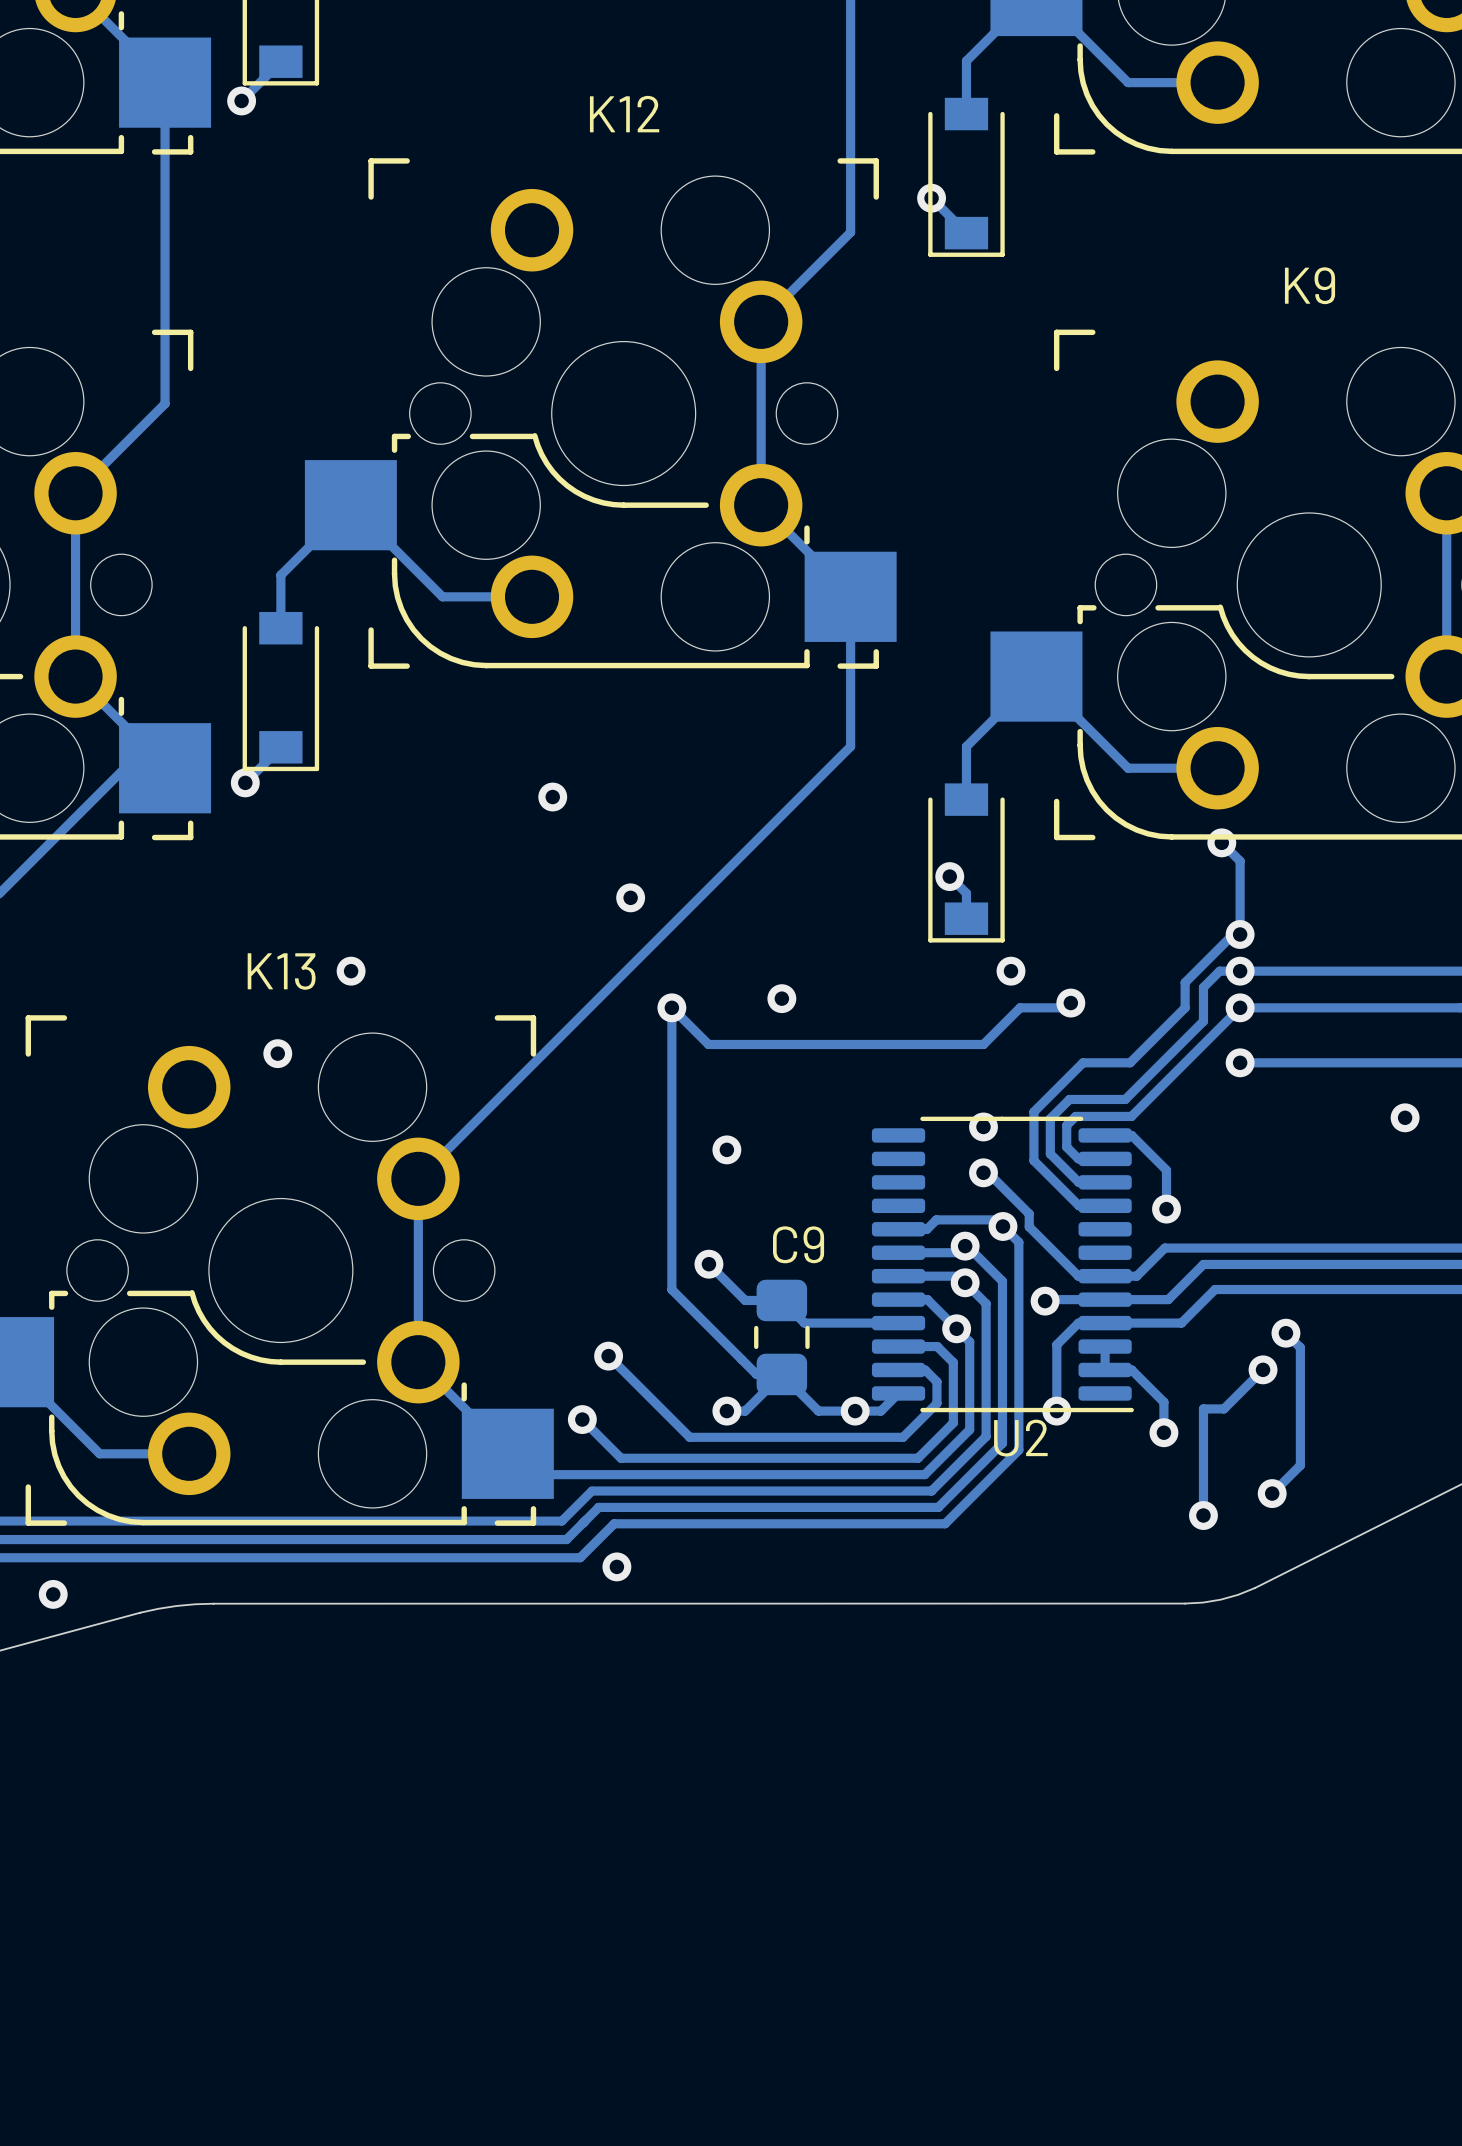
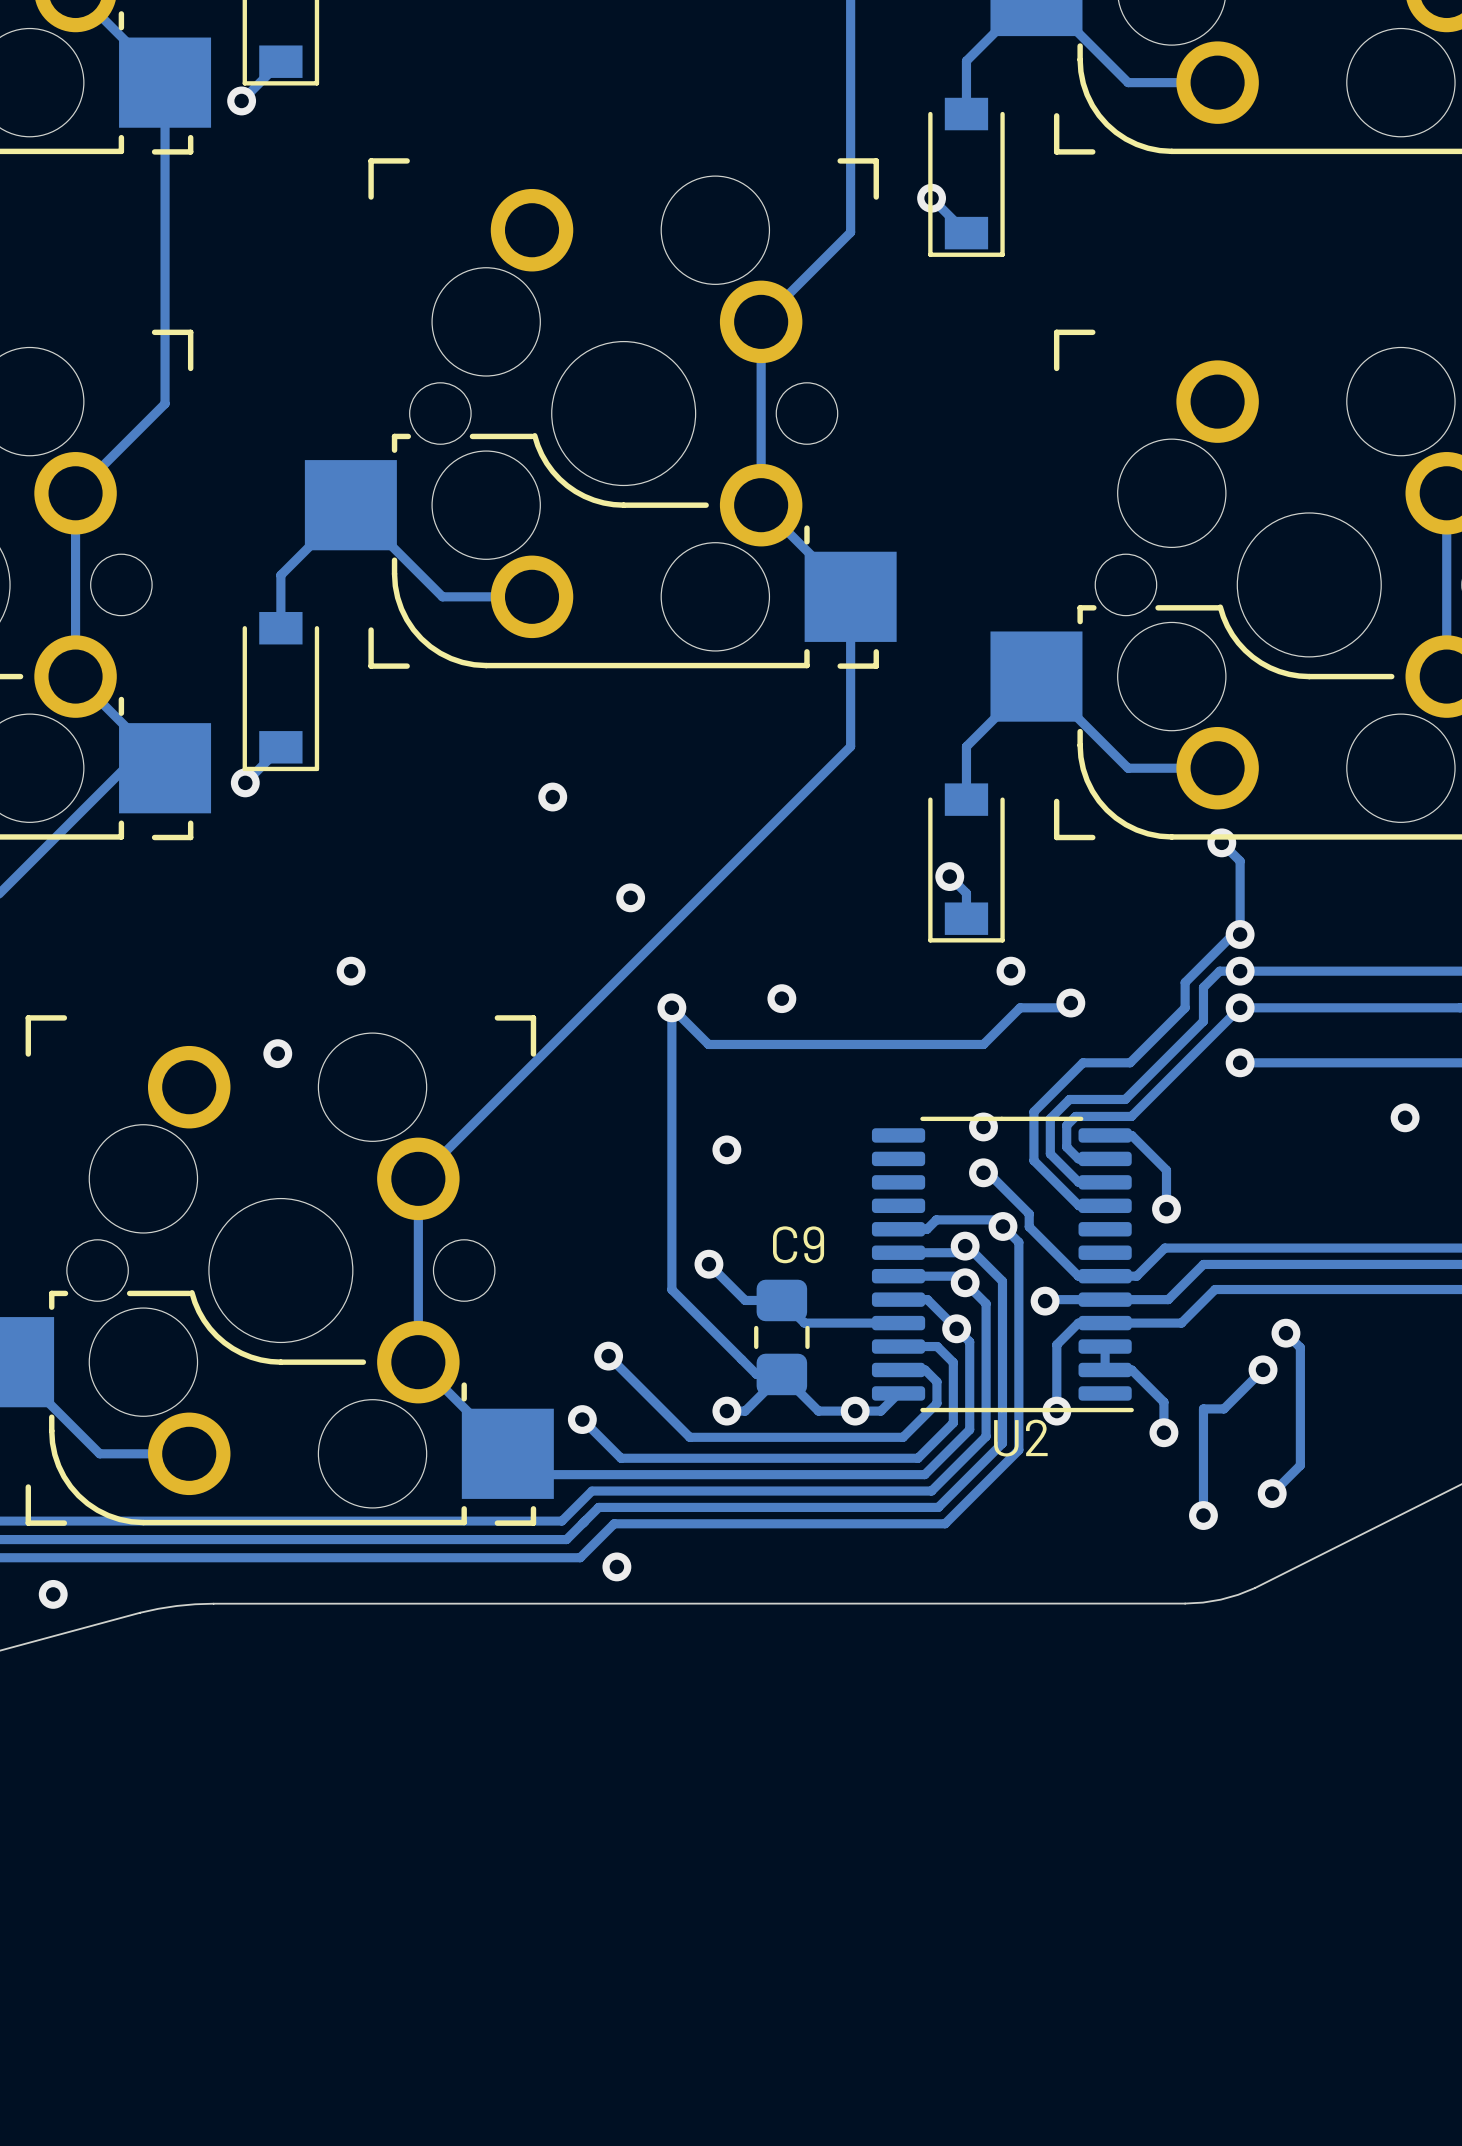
K12 name: K12 (624, 114) -> none
K9 name: K9 (1310, 285) -> none
K13 name: K13 (281, 971) -> none

